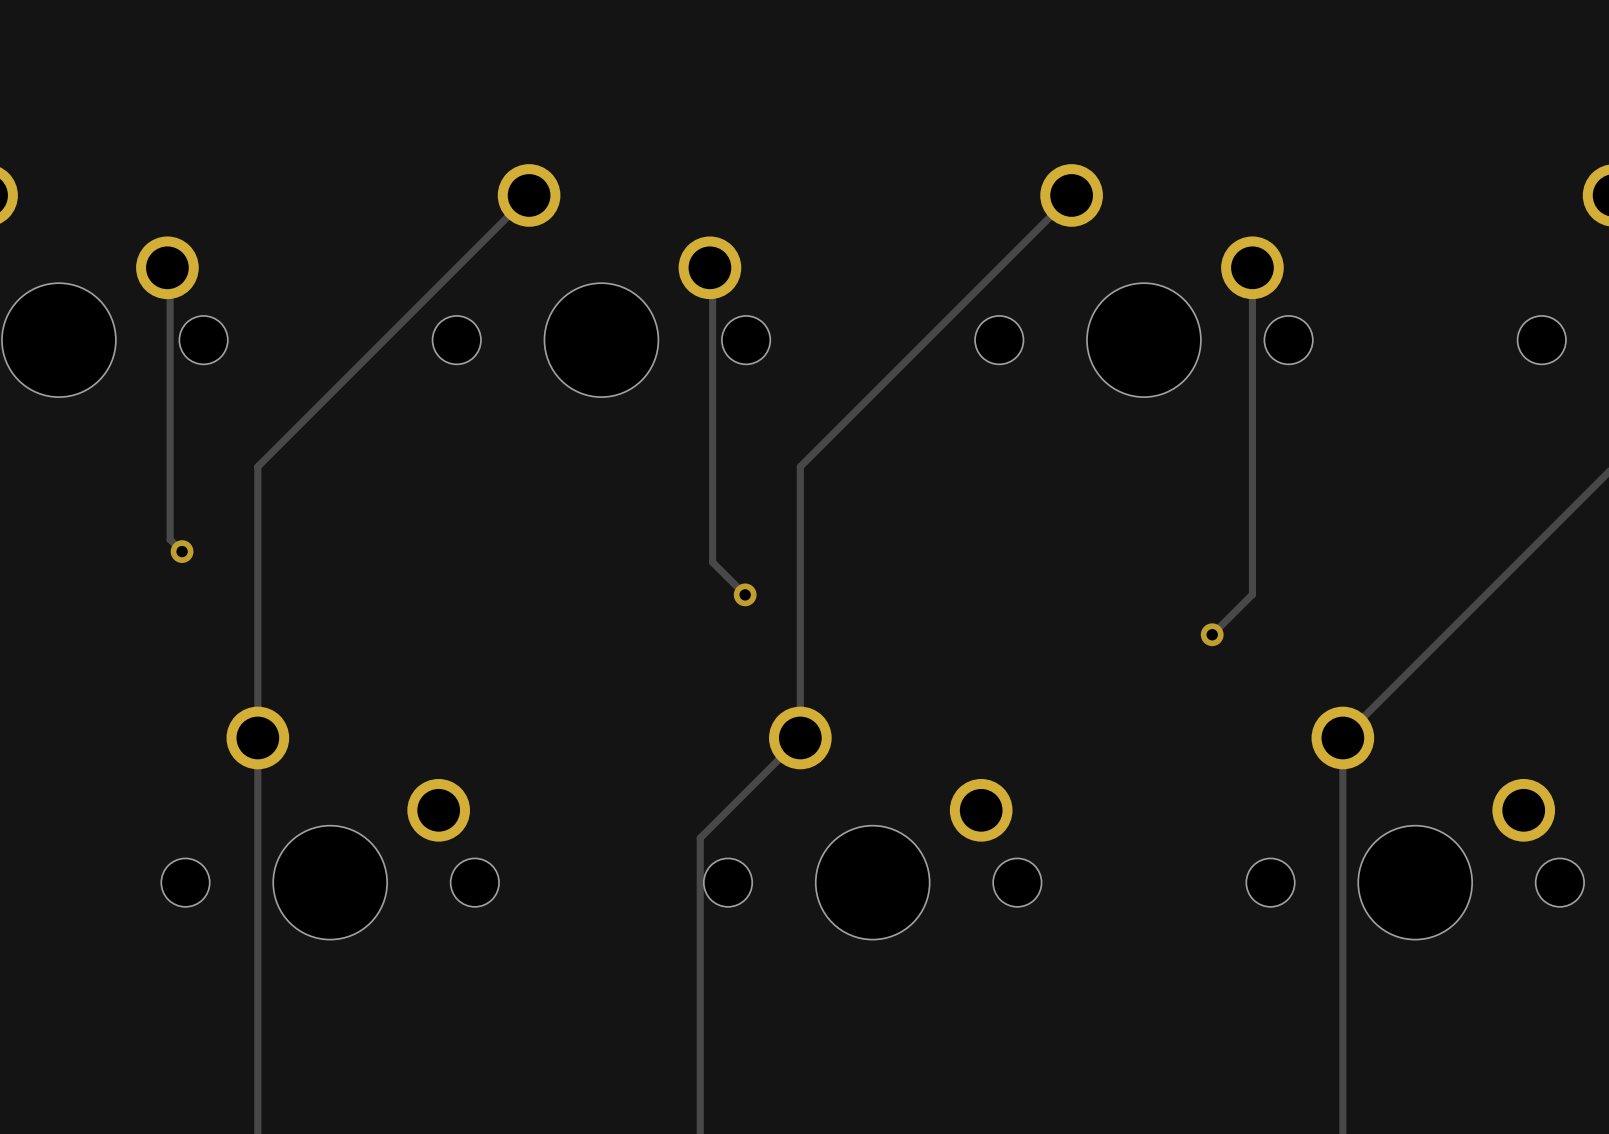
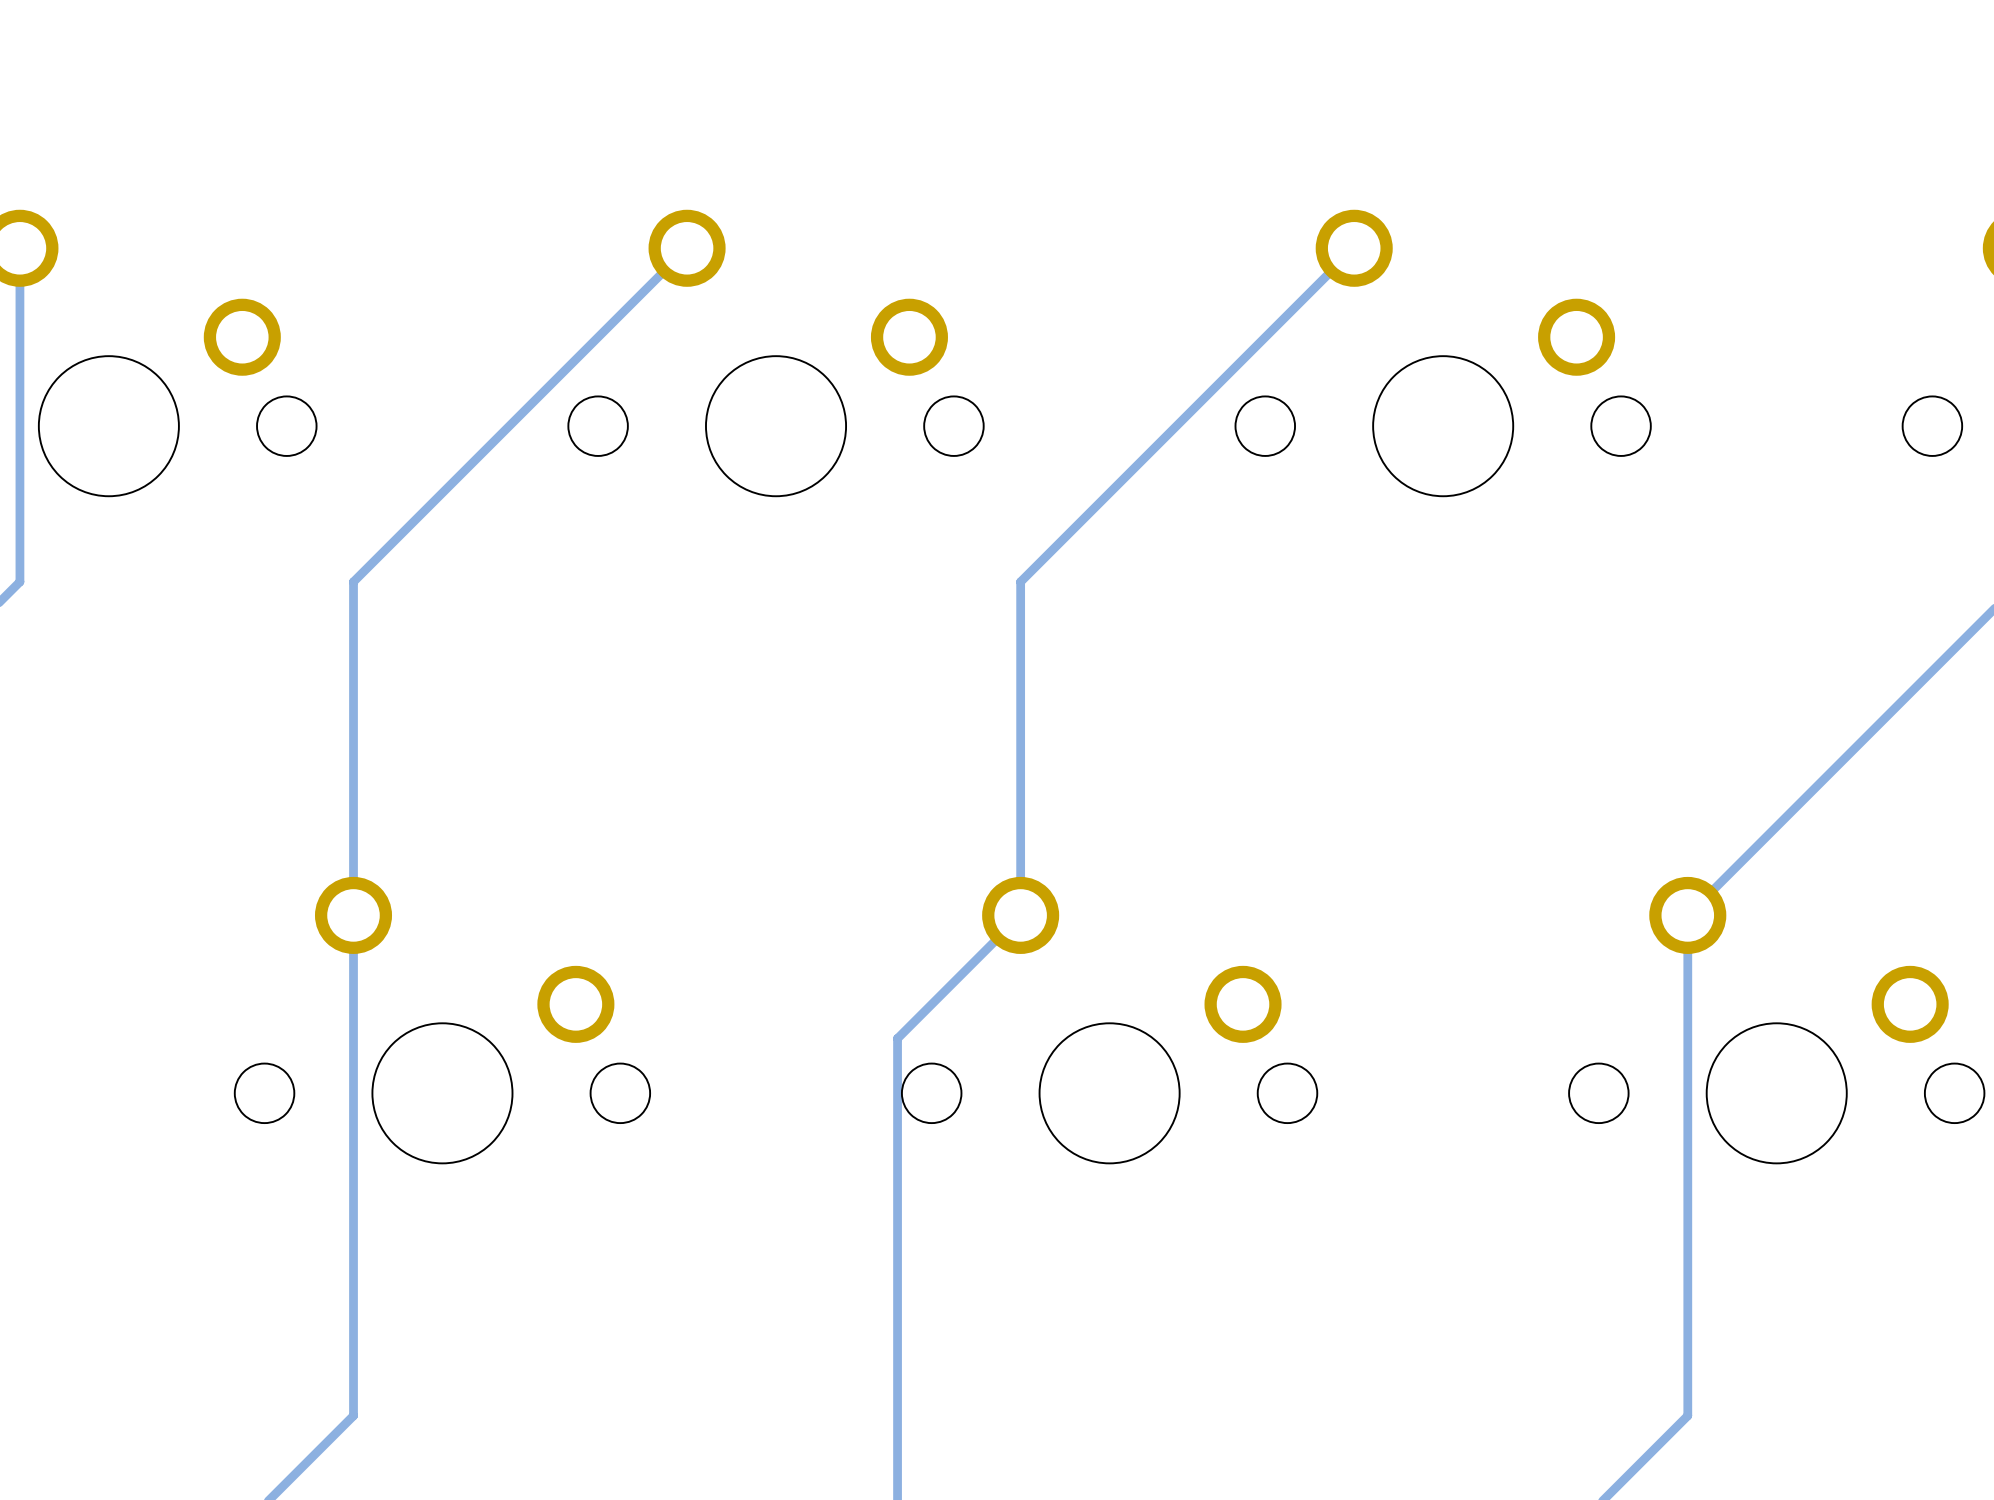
track: (1252, 267) (1252, 594) (1212, 634) -> none
track: (170, 270) (170, 539) (182, 551) -> none
track: (712, 270) (712, 562) (745, 594) -> none
via: (182, 551) -> none
via: (745, 594) -> none
via: (1212, 634) -> none

